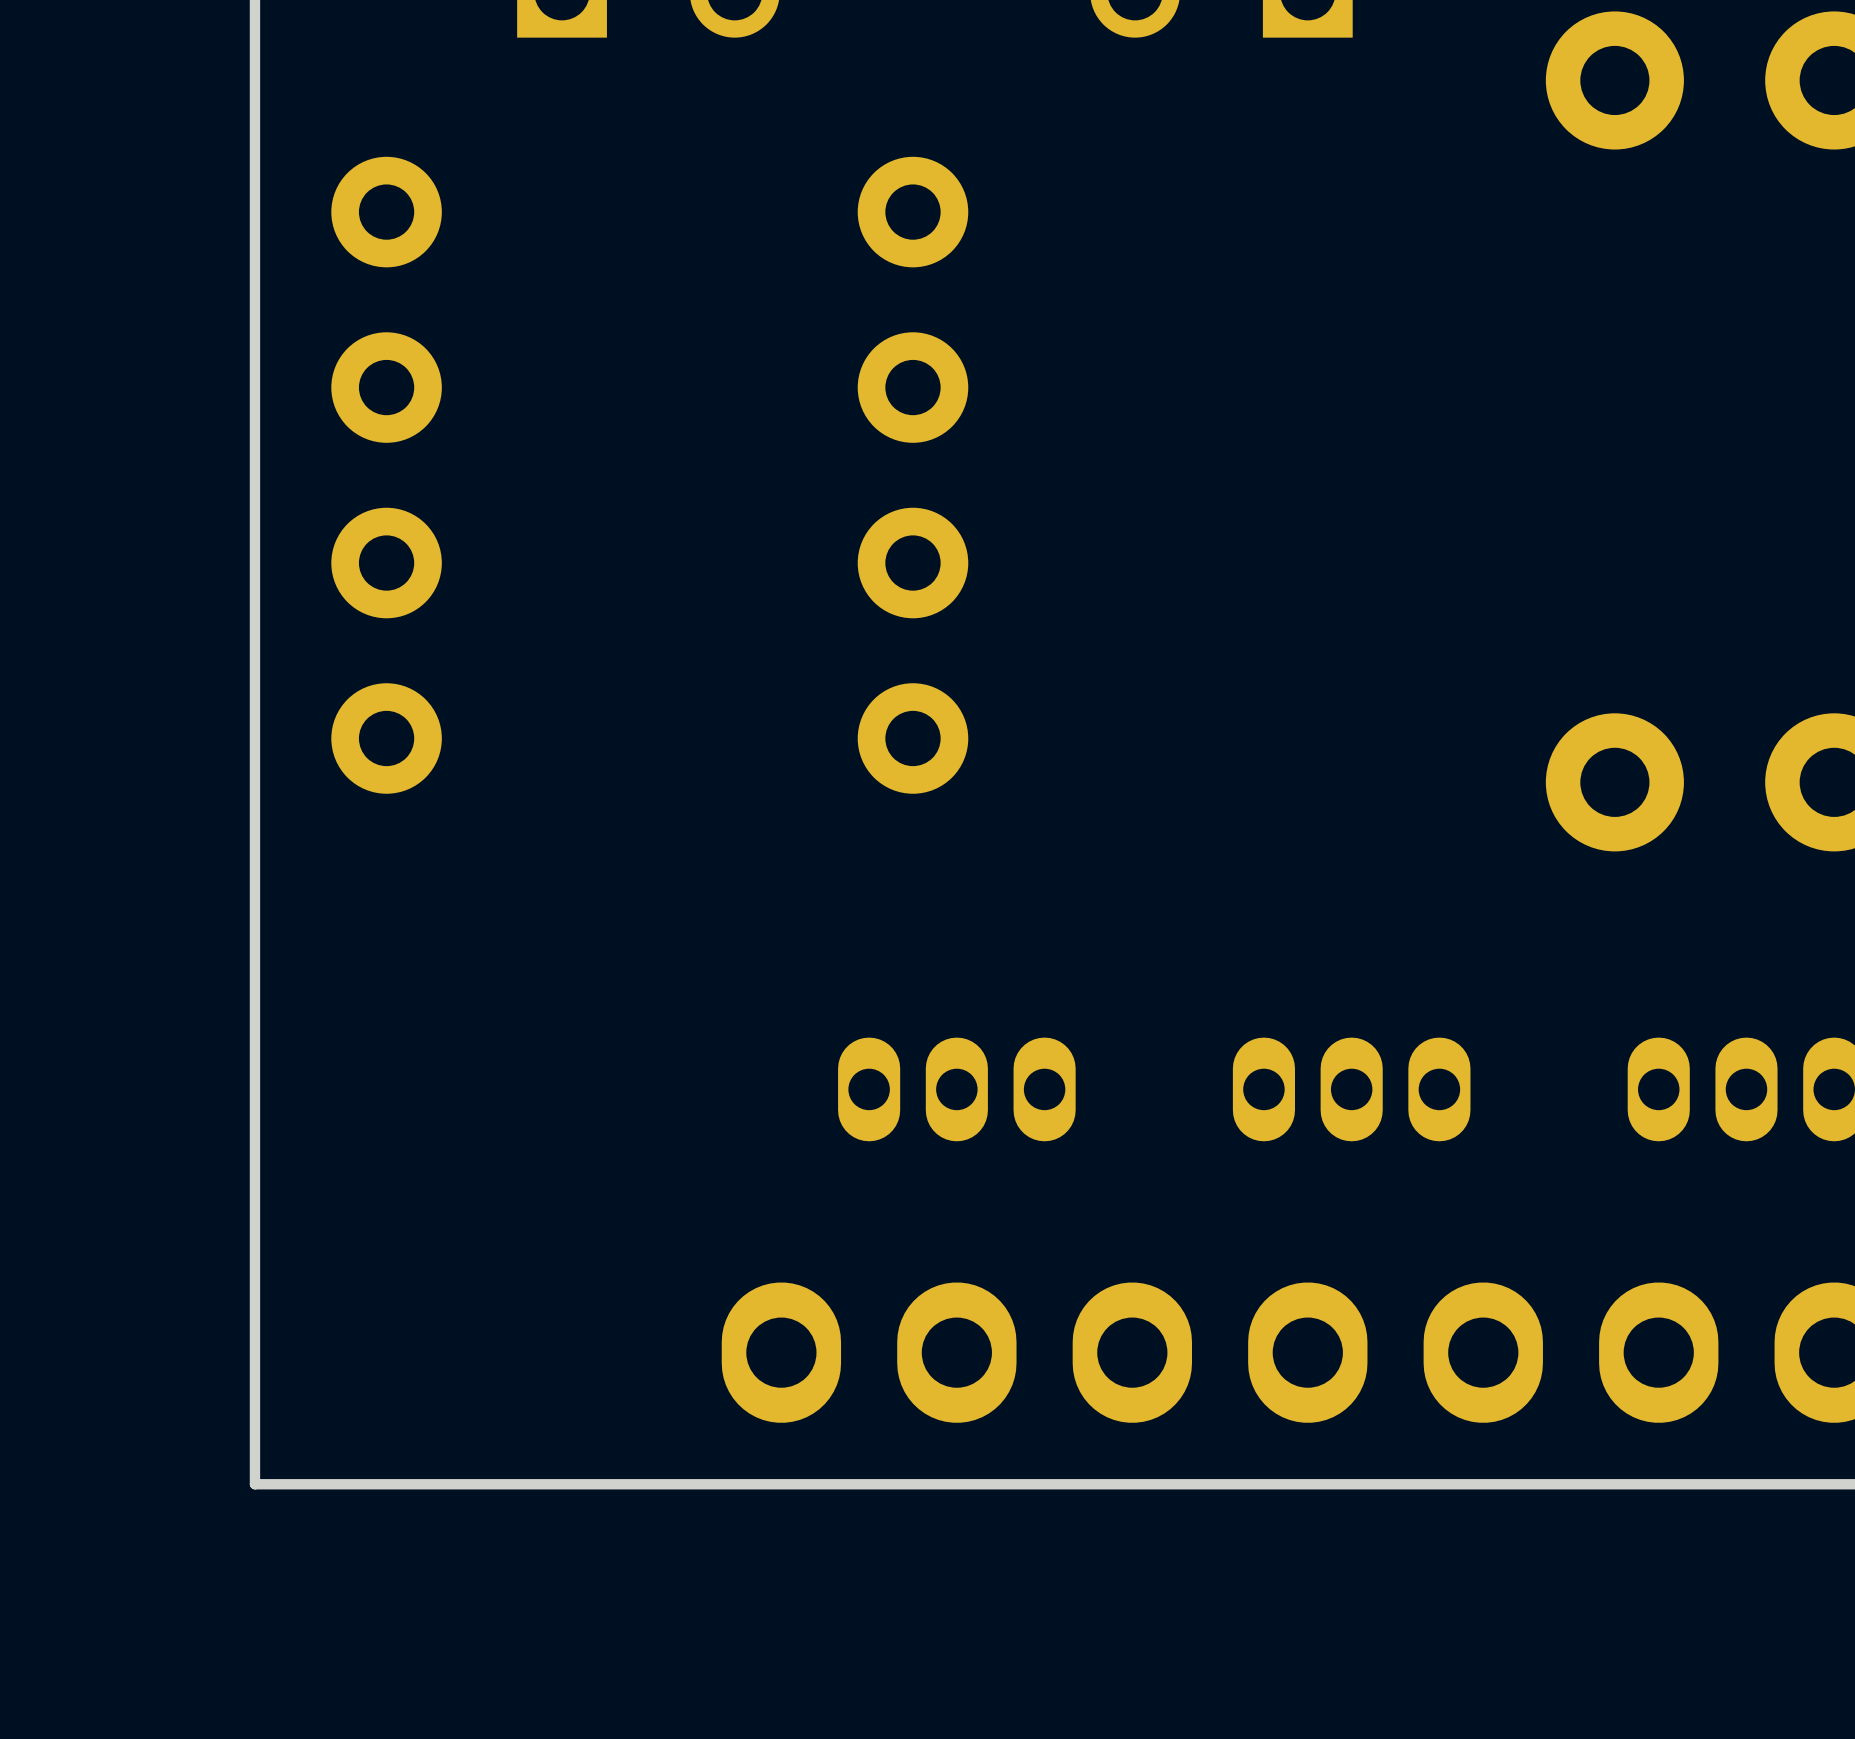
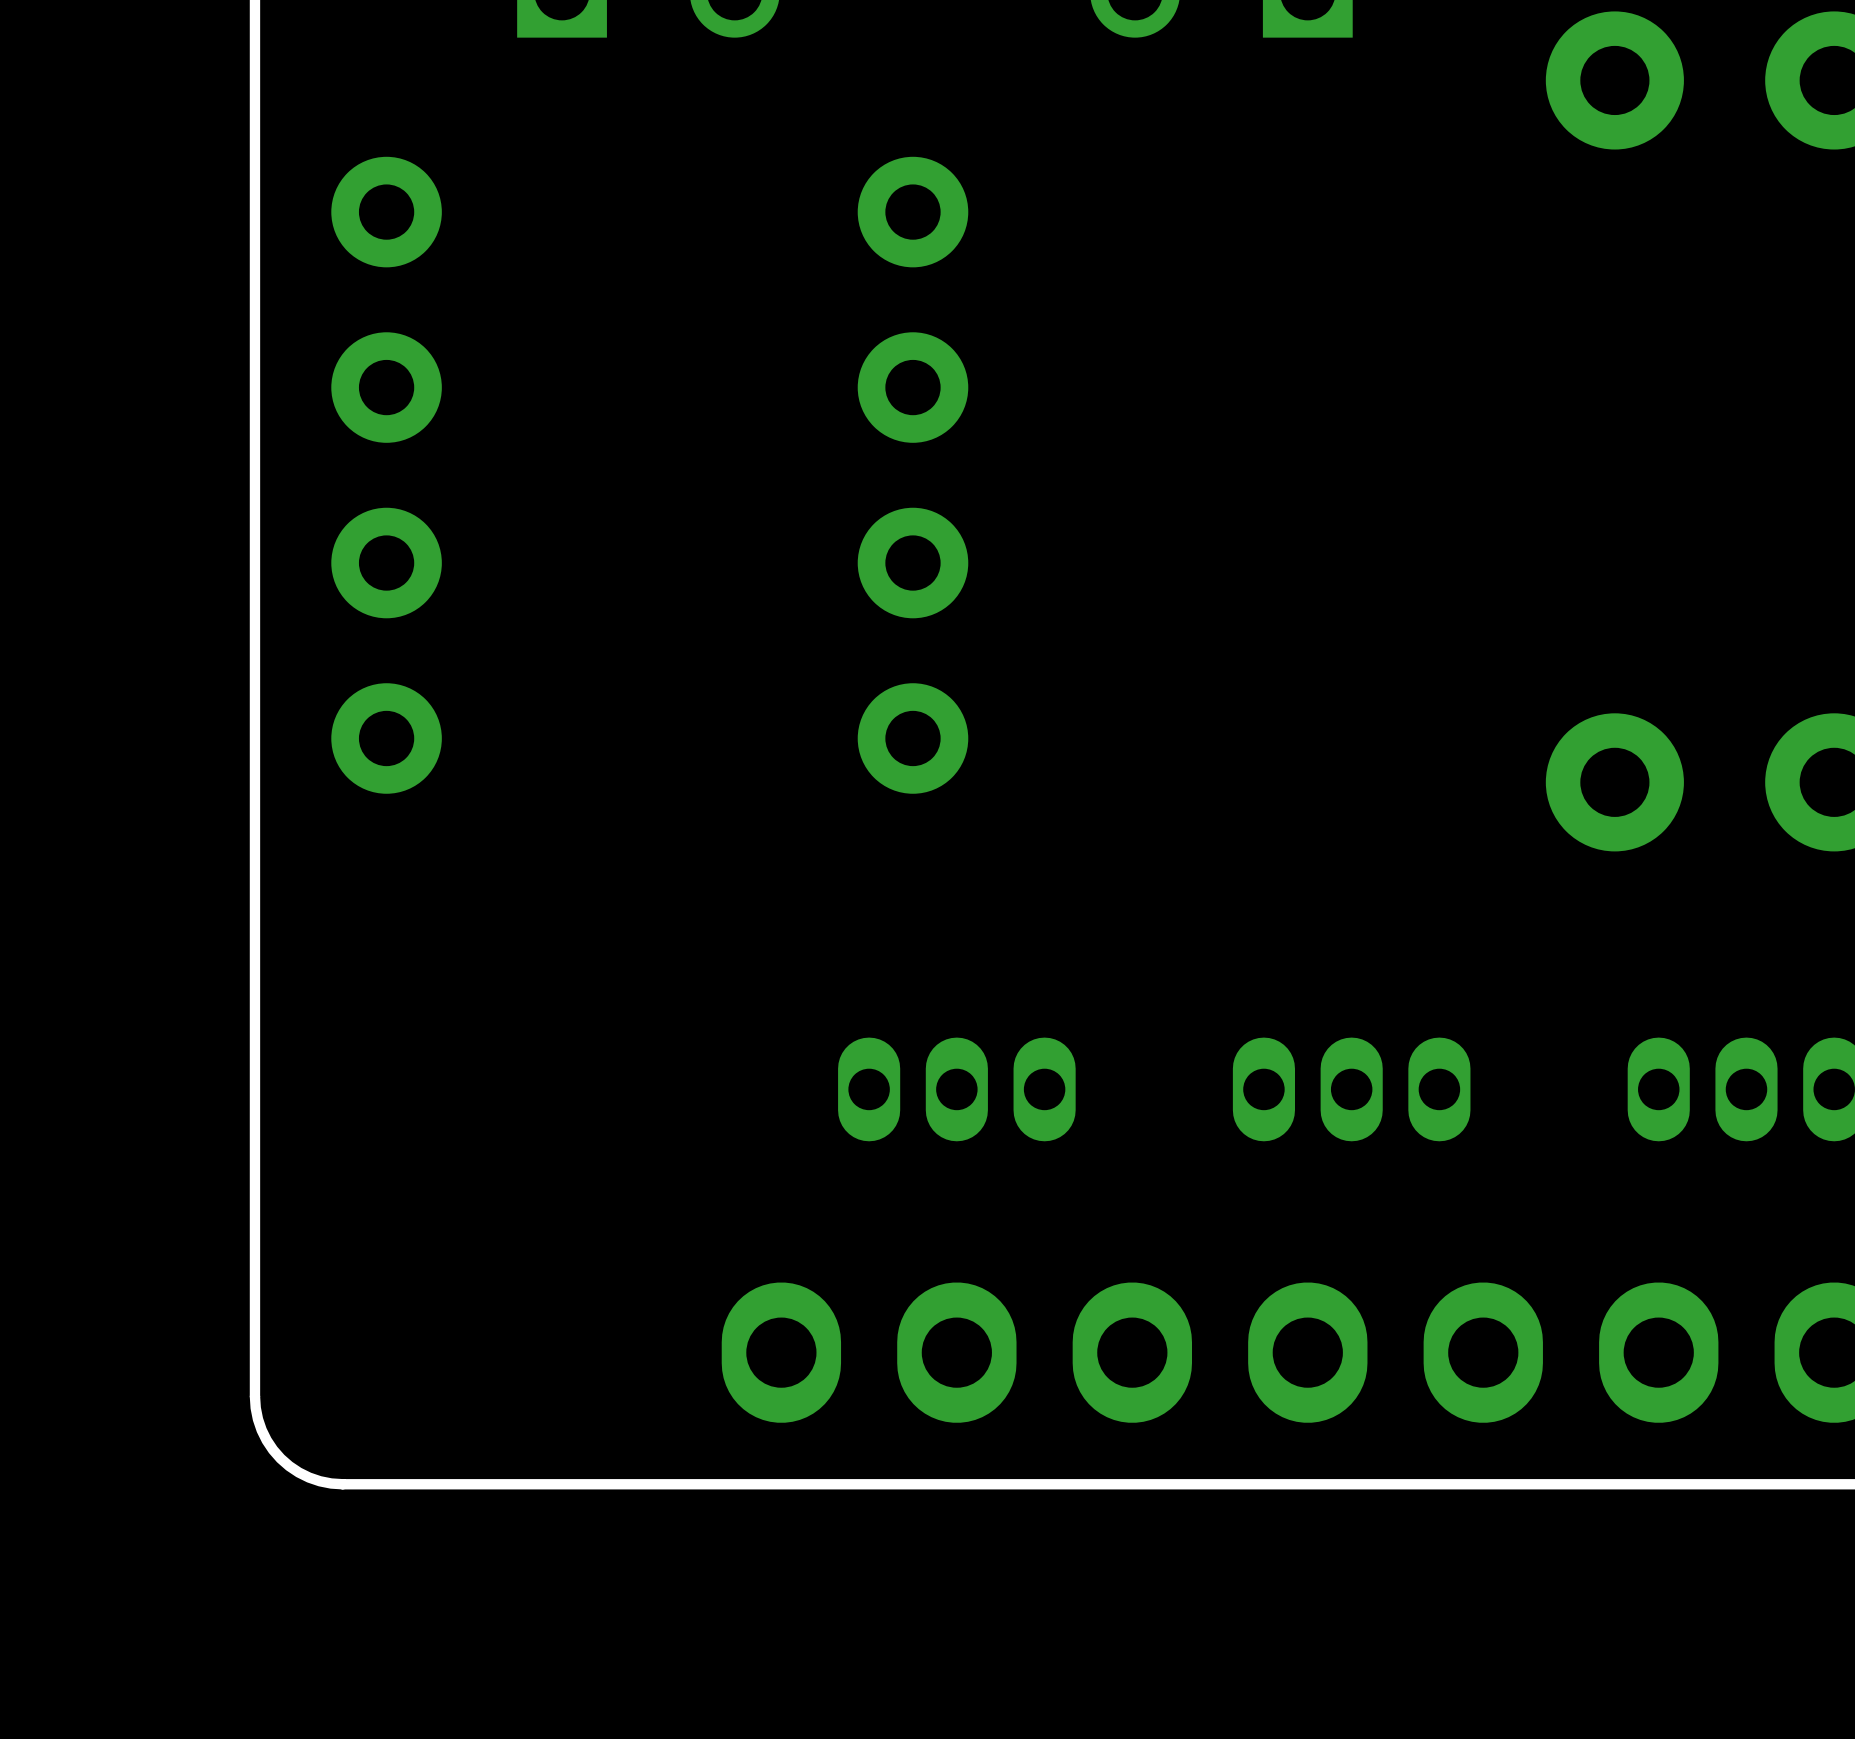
board edge: (254, 1396) (254, 1484) (342, 1484) -> (254, 1396) (261, 1430) (280, 1458) (309, 1477) (342, 1484)

